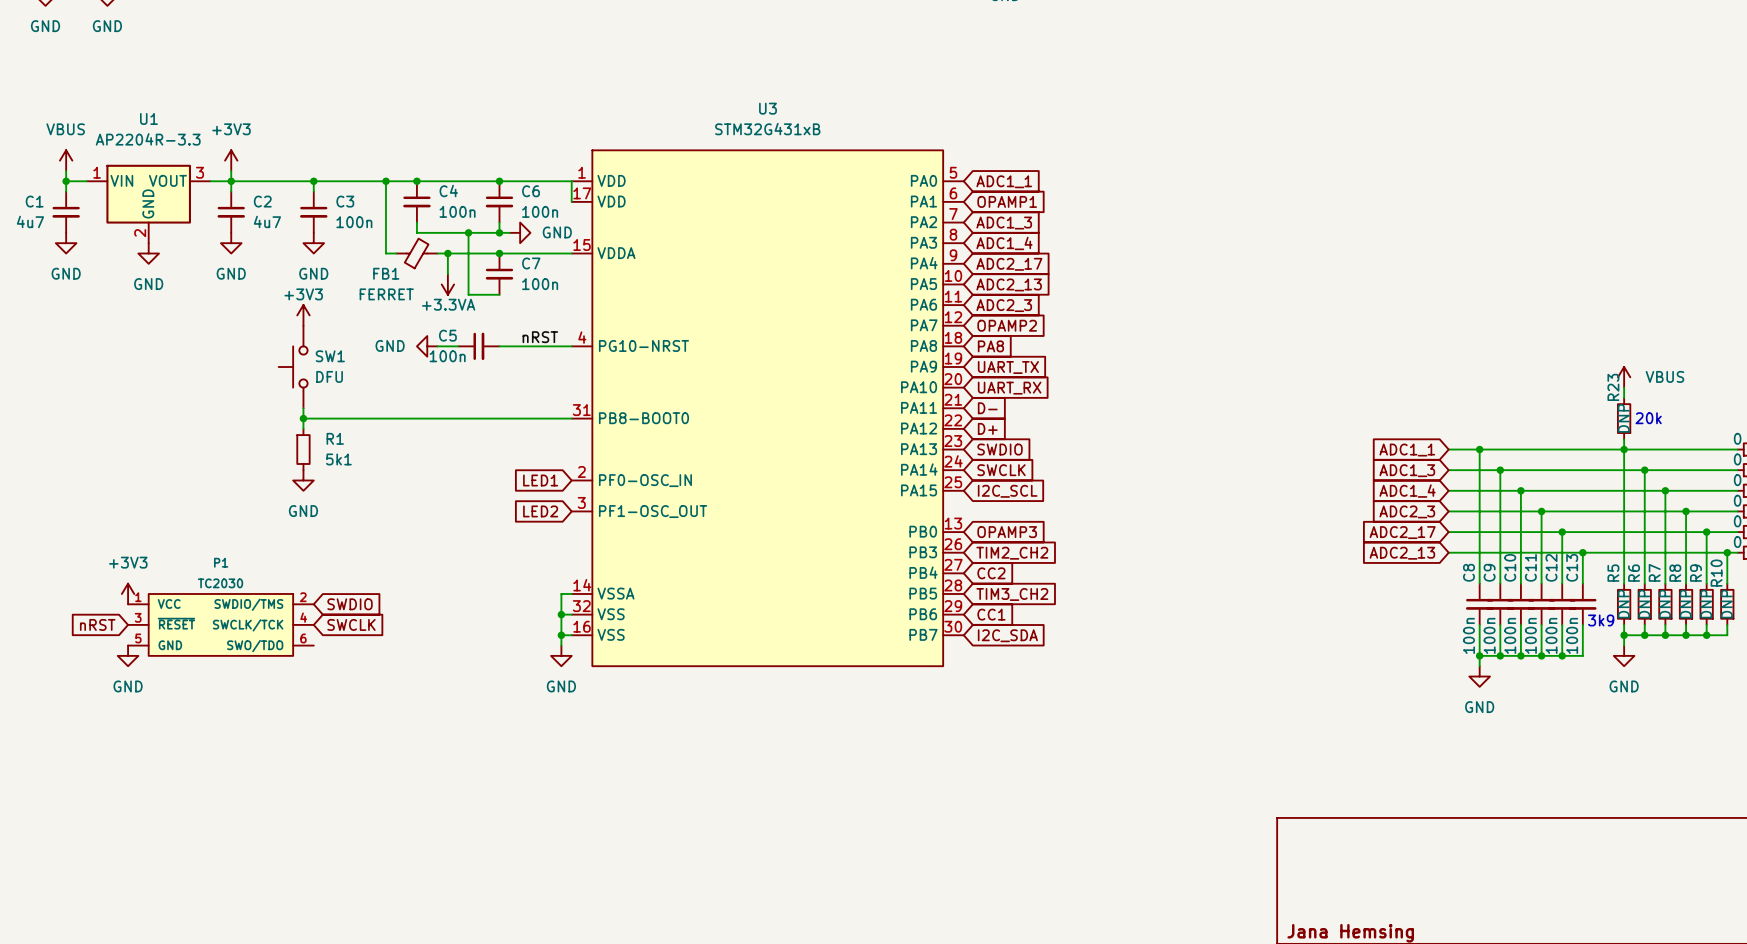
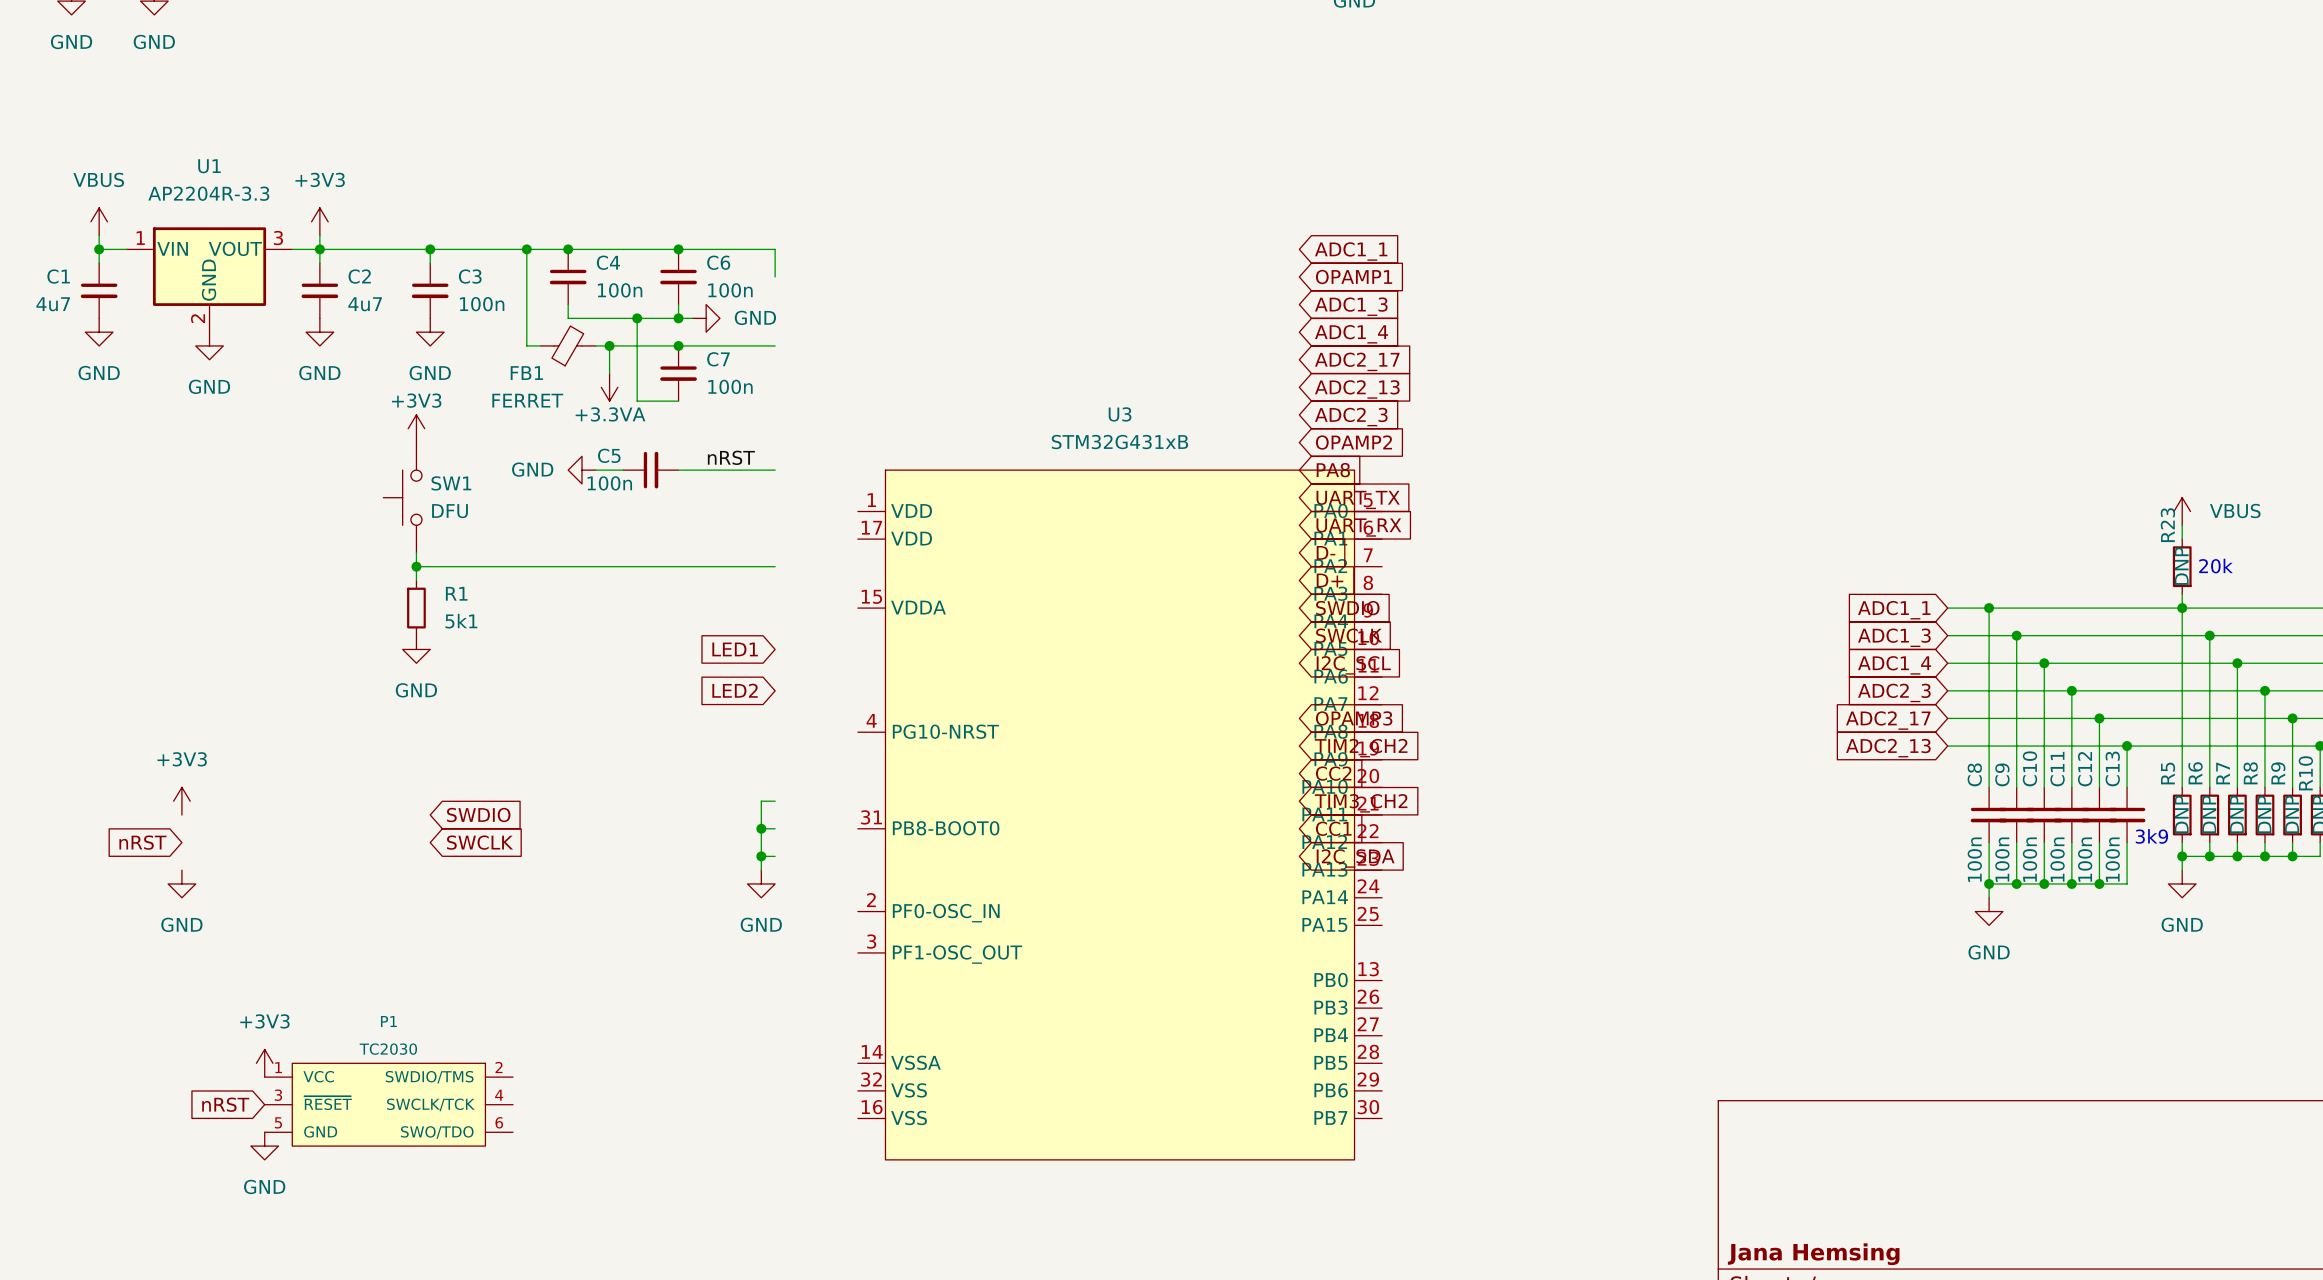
U3 position: (767, 408) -> (1120, 815)
P1 position: (220, 624) -> (388, 1104)
power symbol: none -> +3V3 (264, 1063)
global label: none -> nRST (225, 1104)
power symbol: none -> GND (264, 1146)

